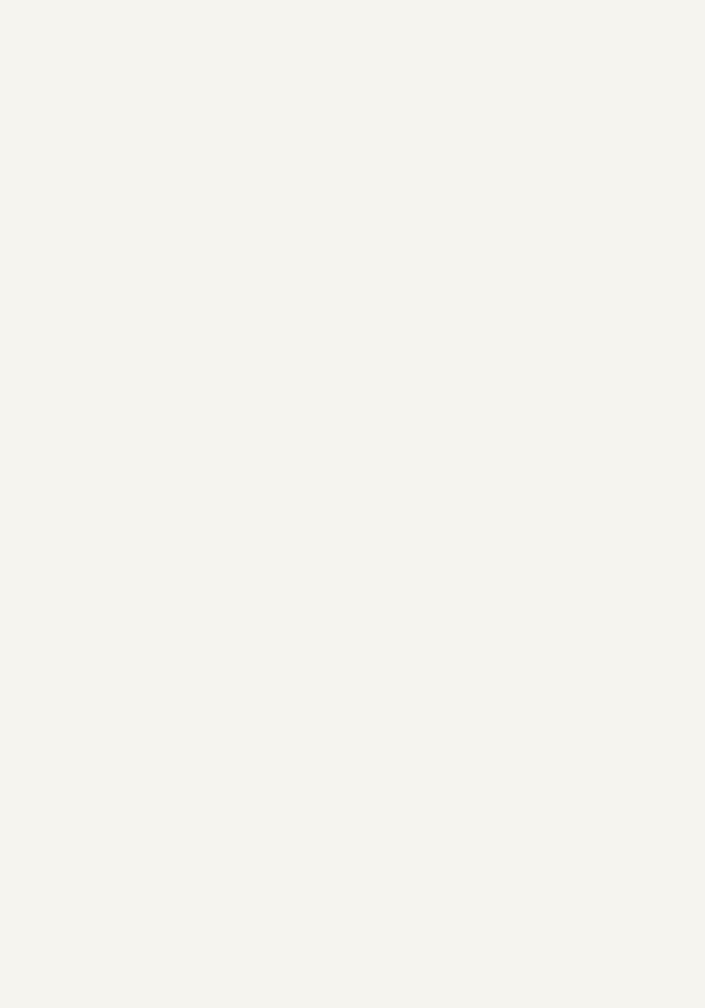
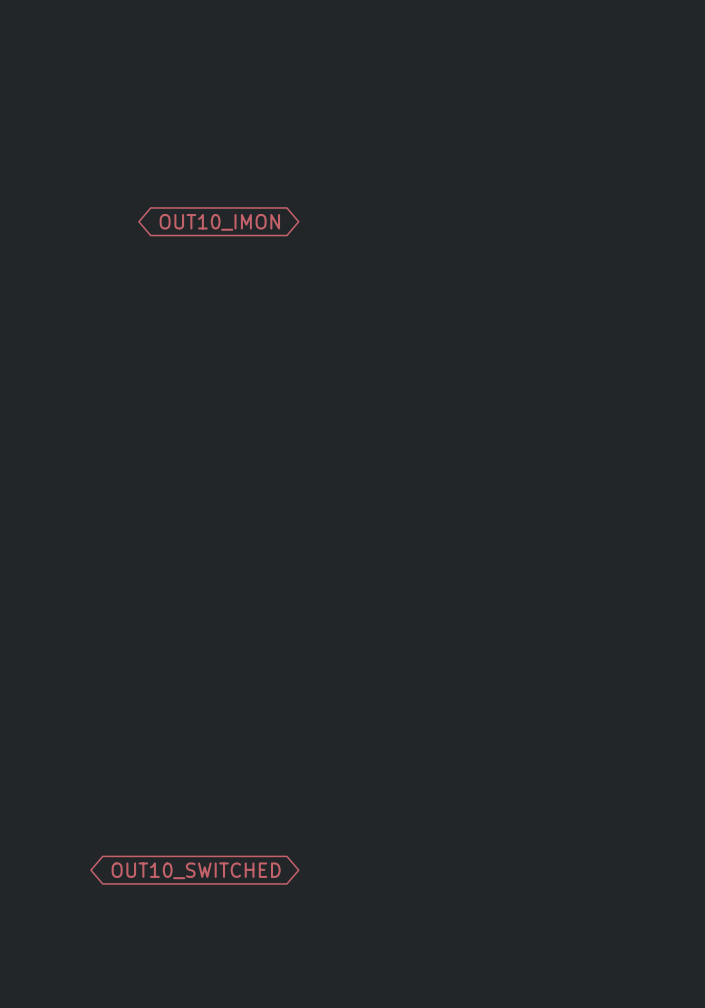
global label: none -> OUT10_IMON (219, 222)
global label: none -> OUT10_SWITCHED (196, 870)

